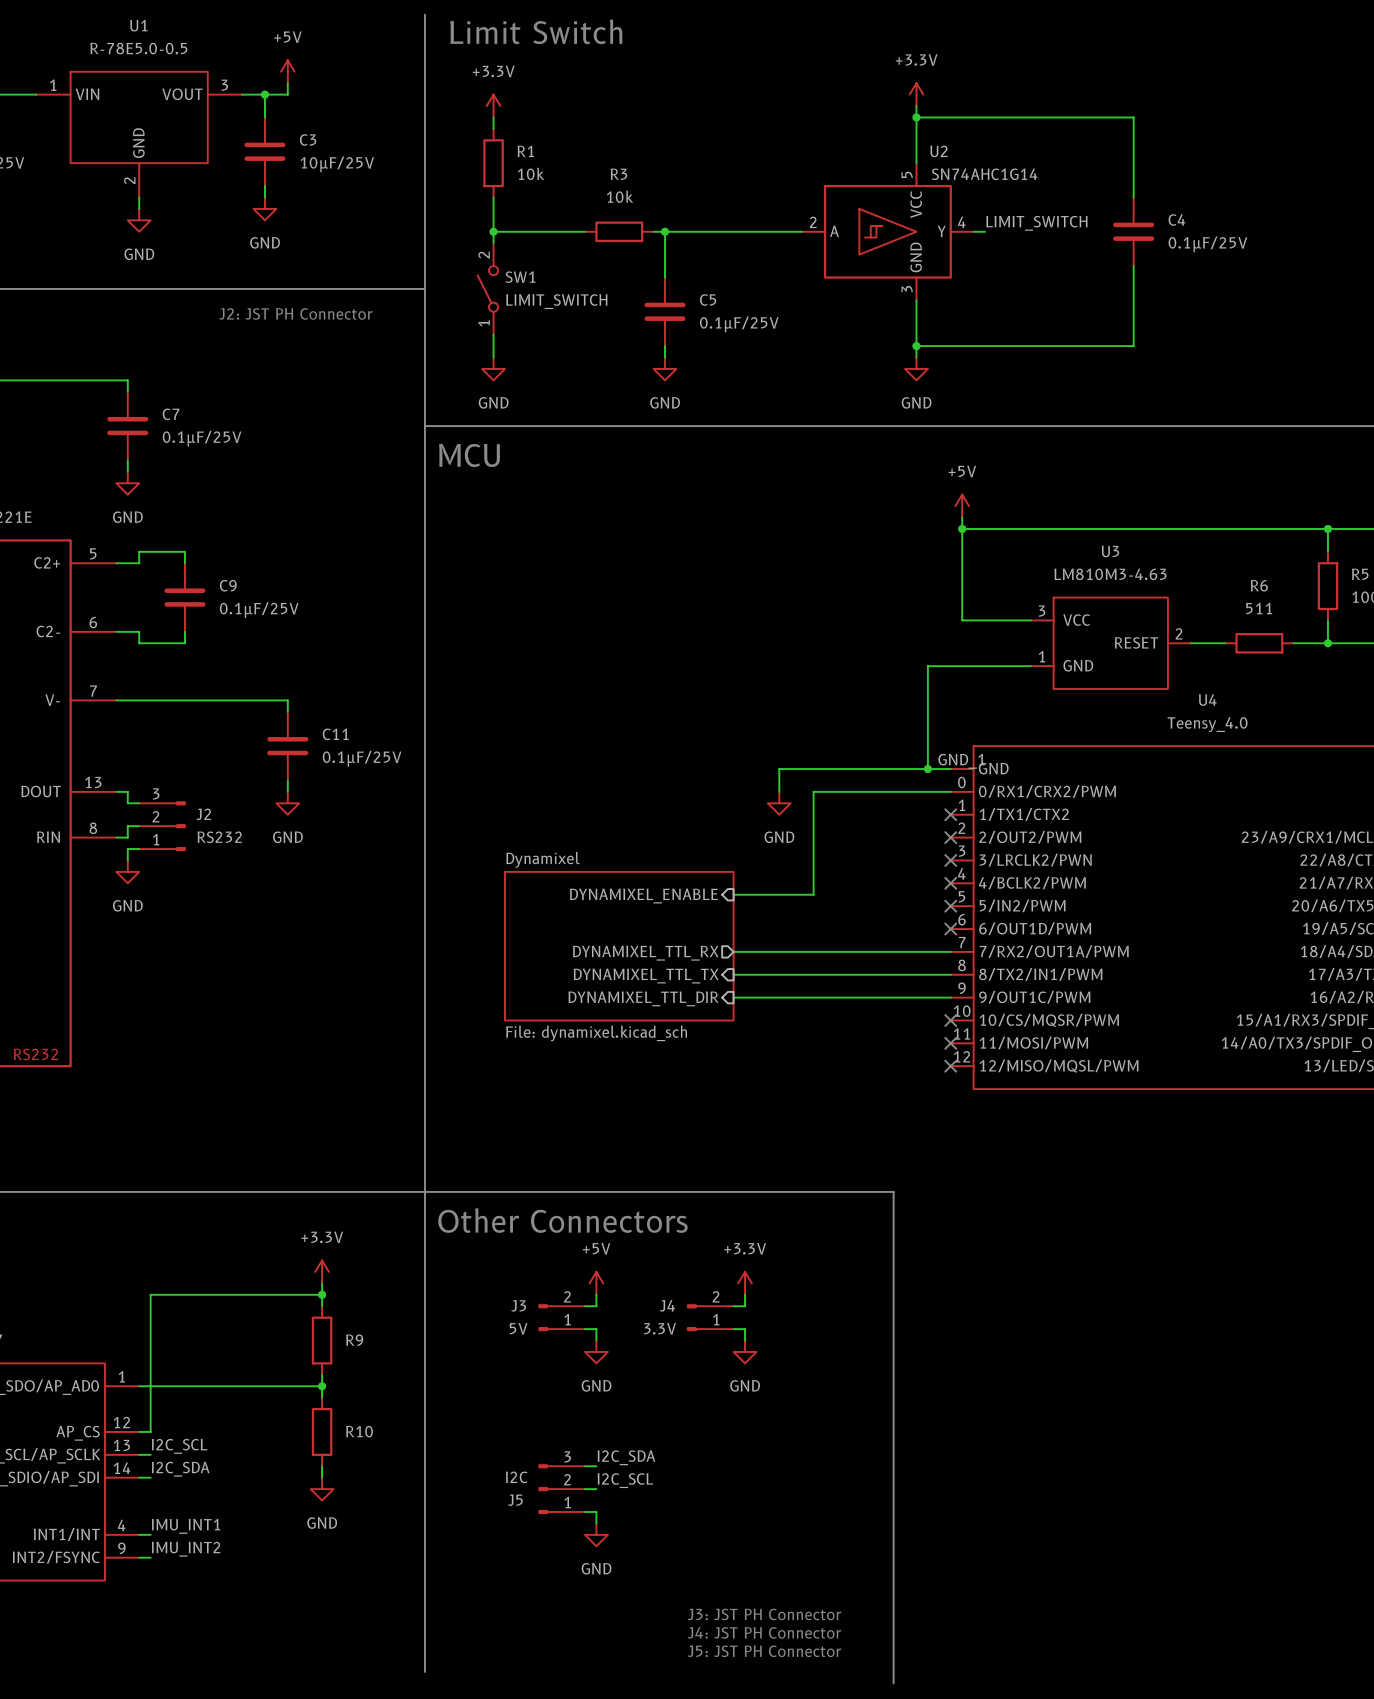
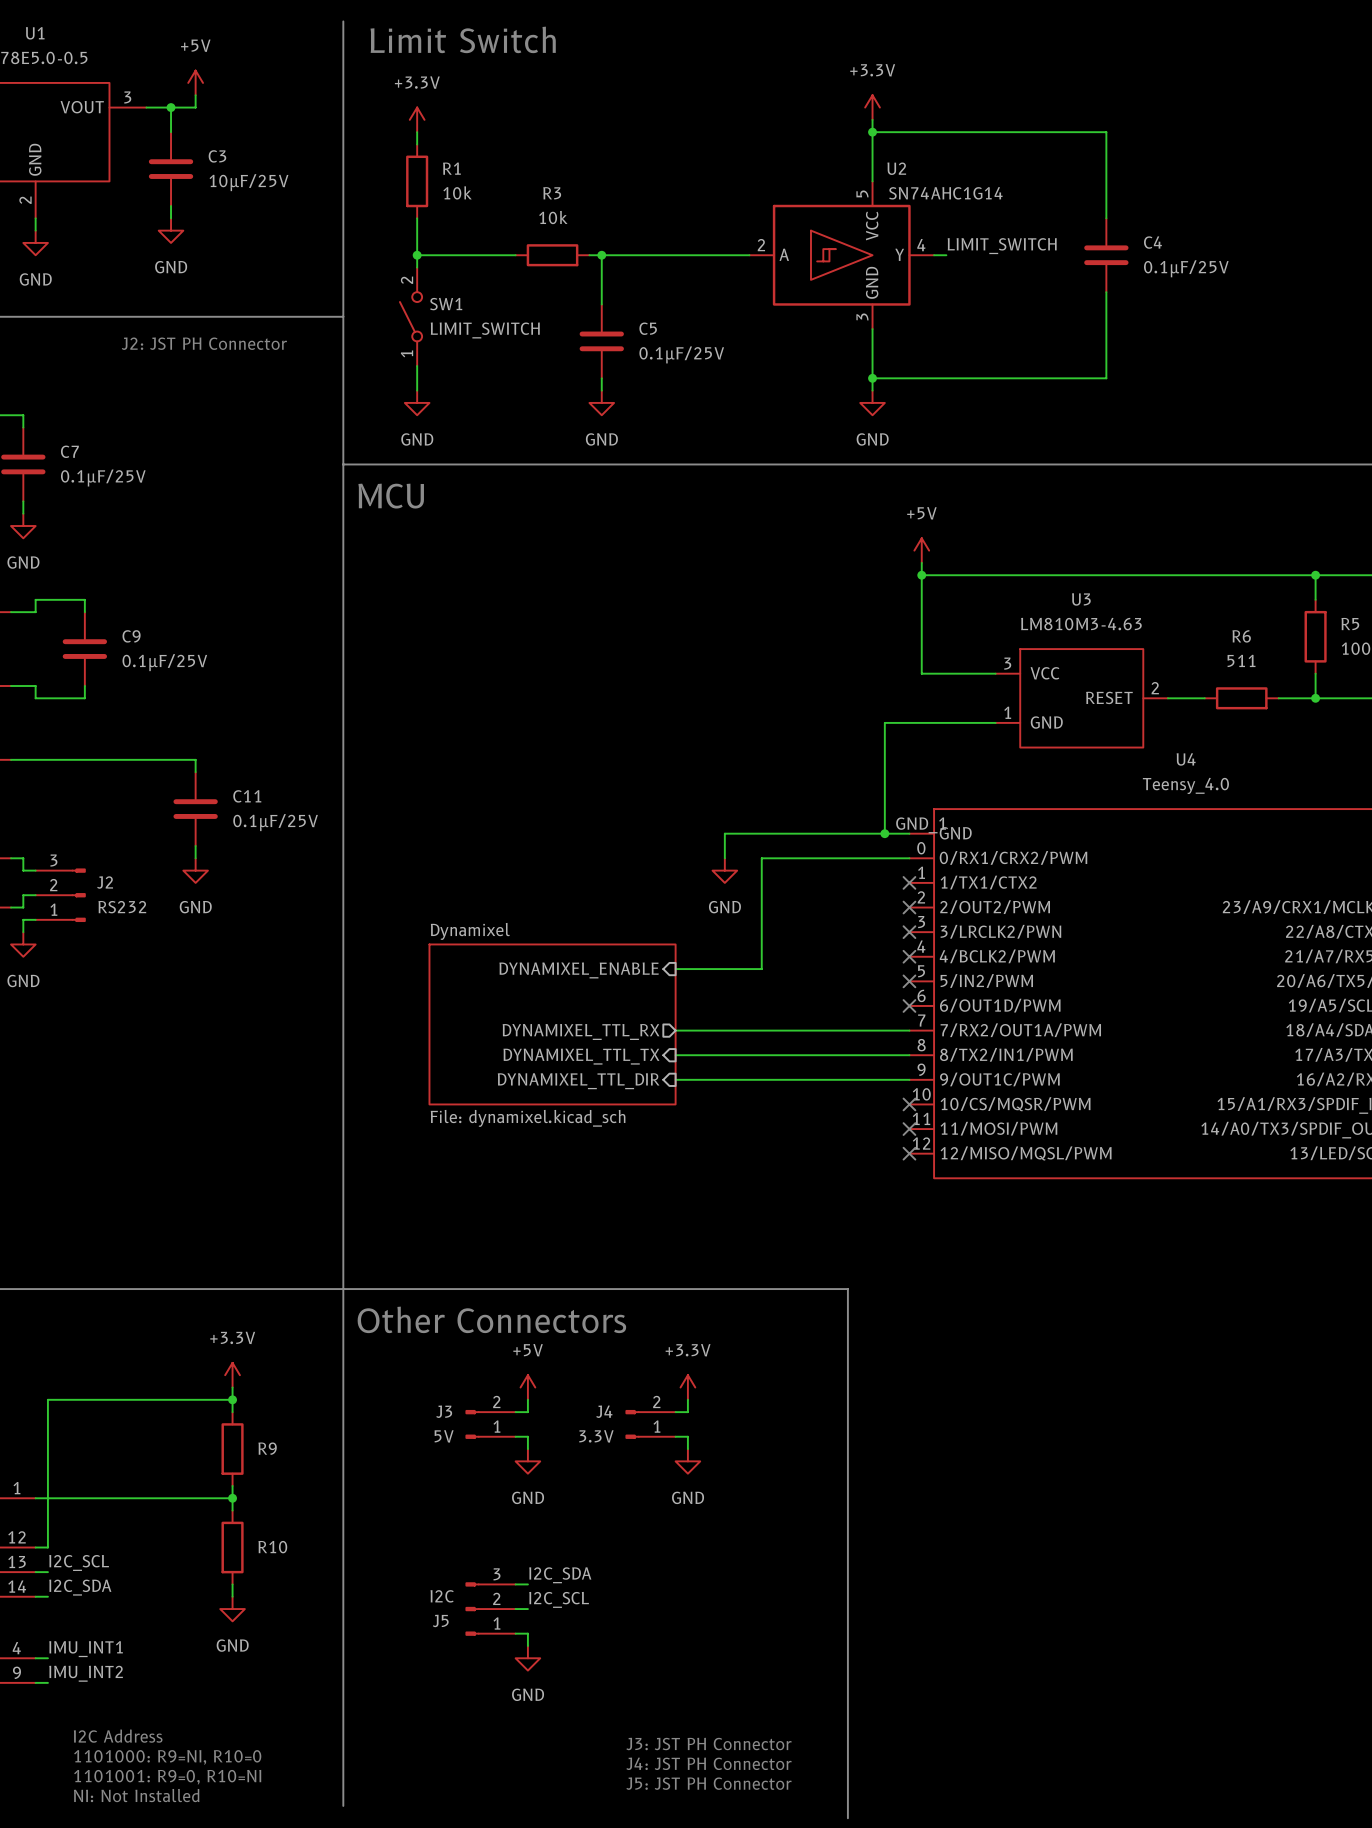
text: none -> I2C Address (118, 1736)
text: none -> 1101000: R9=NI, R10=0 (167, 1757)
text: none -> 1101001: R9=0, R10=NI (167, 1777)
text: none -> NI: Not Installed (136, 1795)

